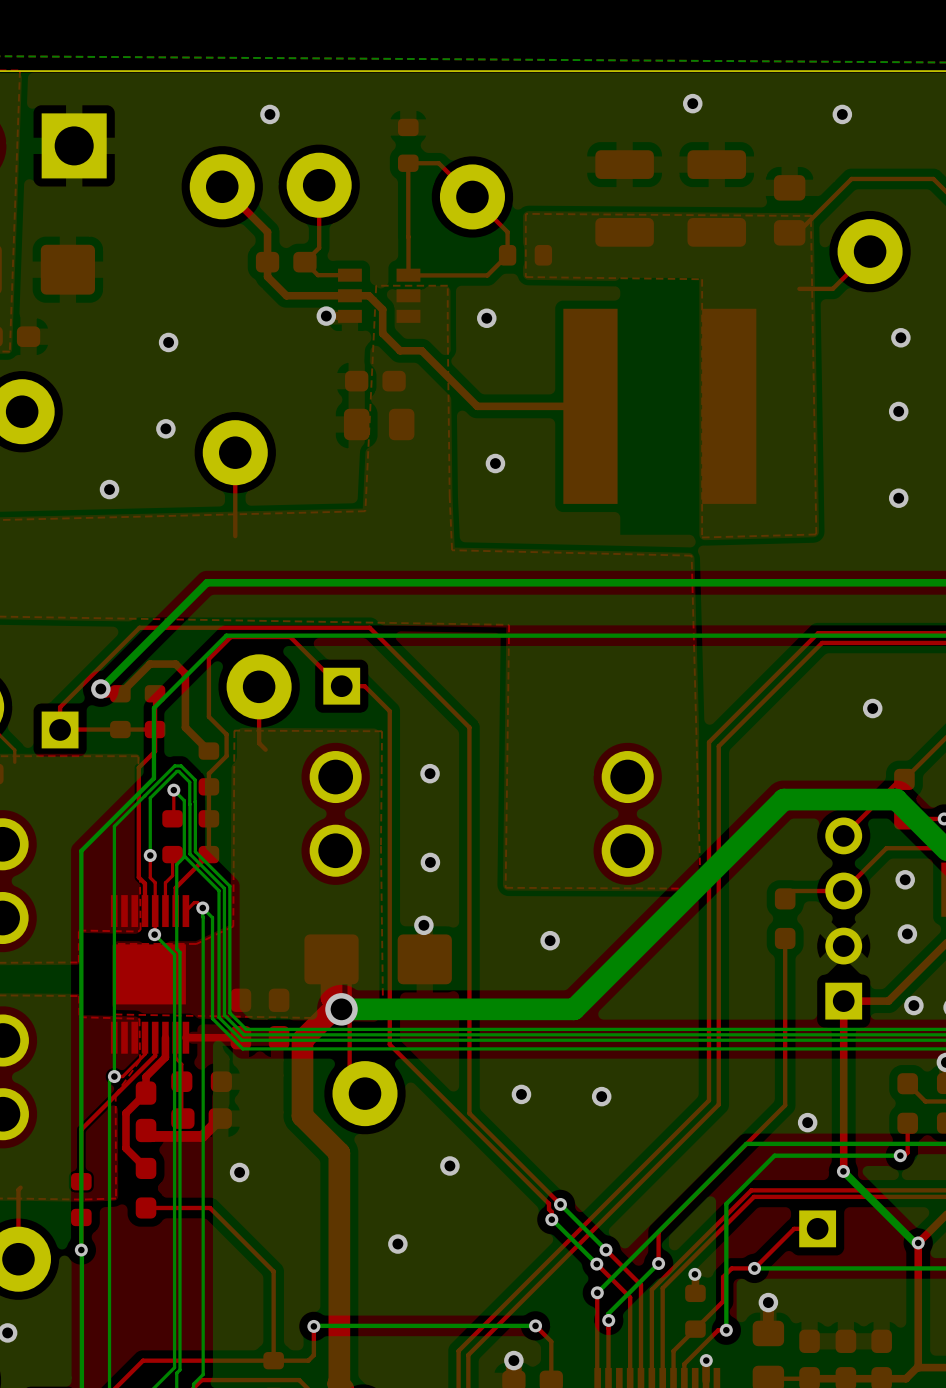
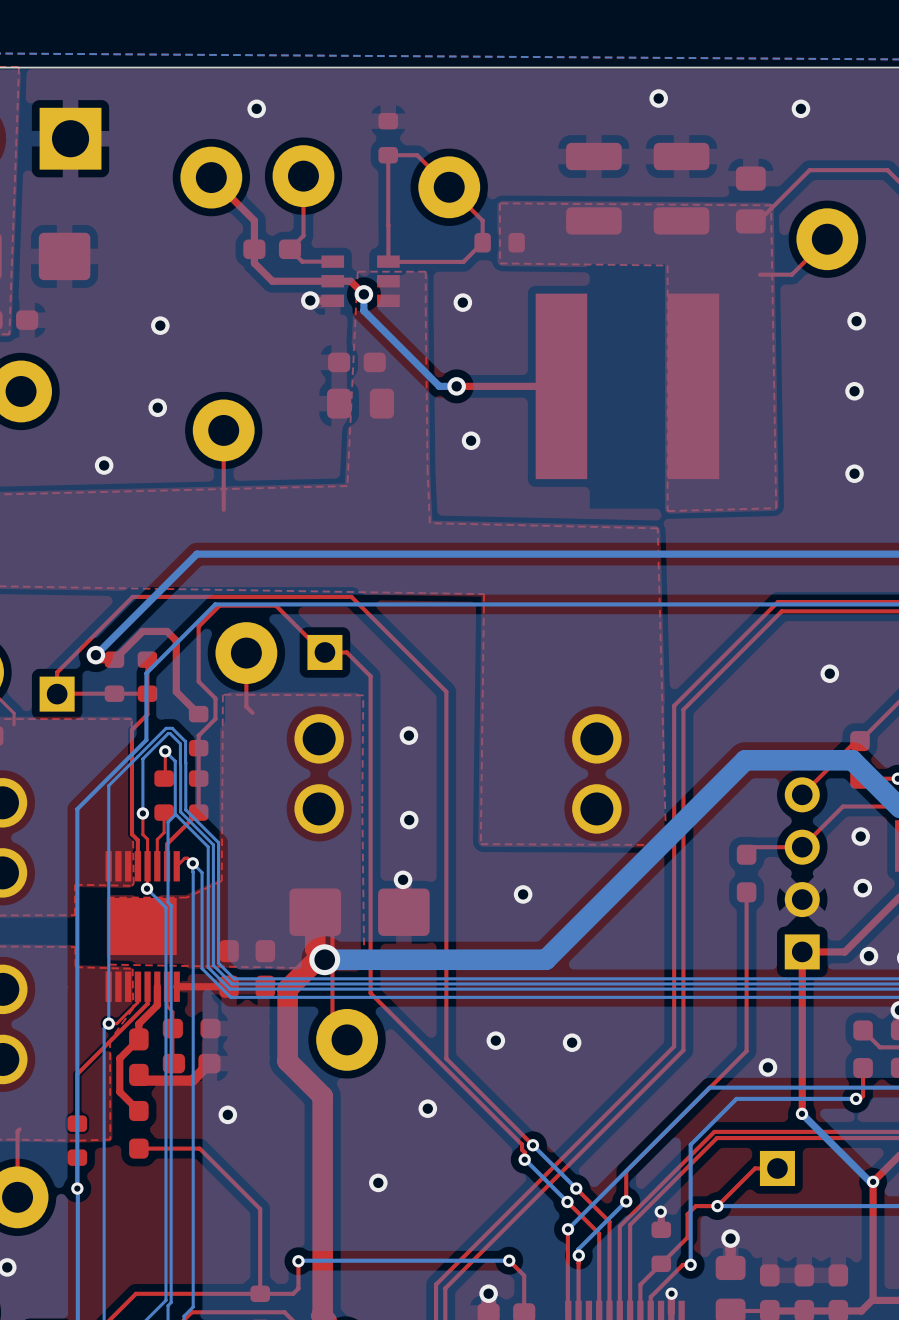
top track: (382, 309) (382, 333) (400, 350) (421, 350) (477, 406) -> none
bottom track: none -> (363, 294) (363, 310) (439, 386) (456, 386)
via: none -> (363, 294)
via: none -> (456, 386)

